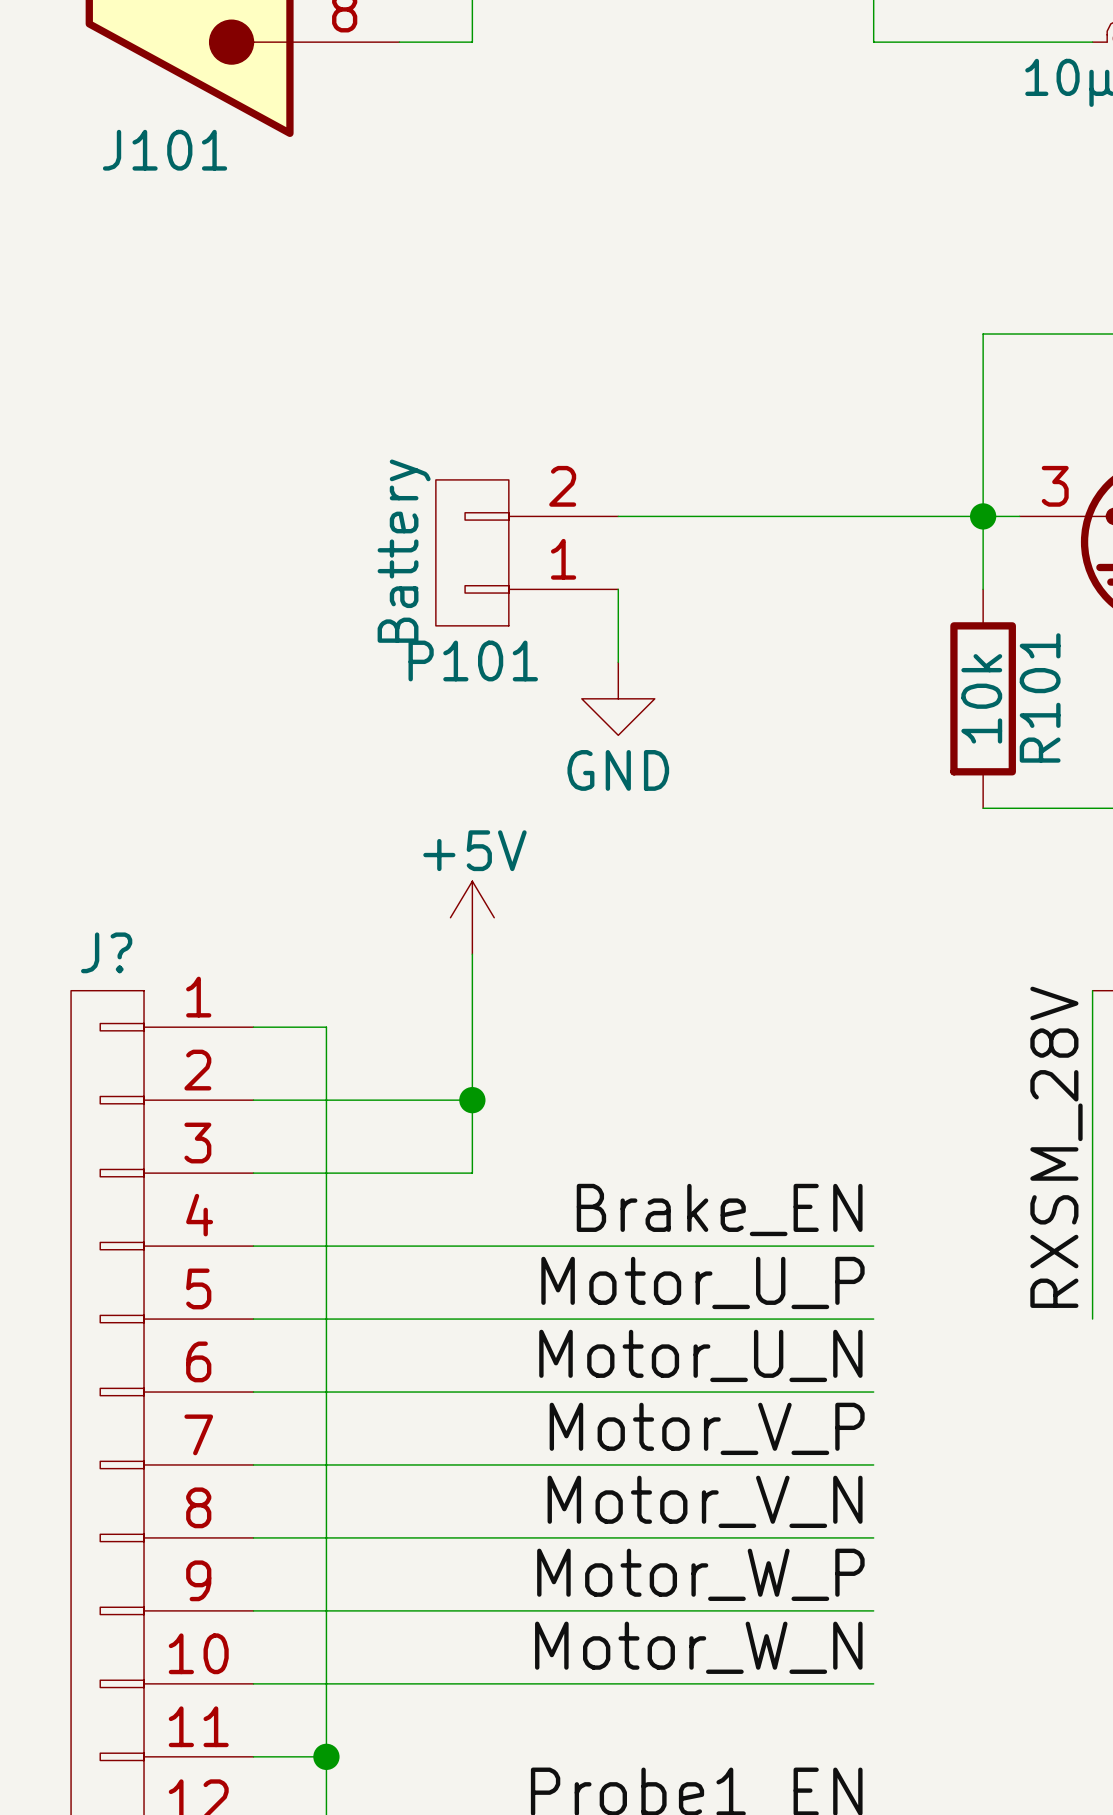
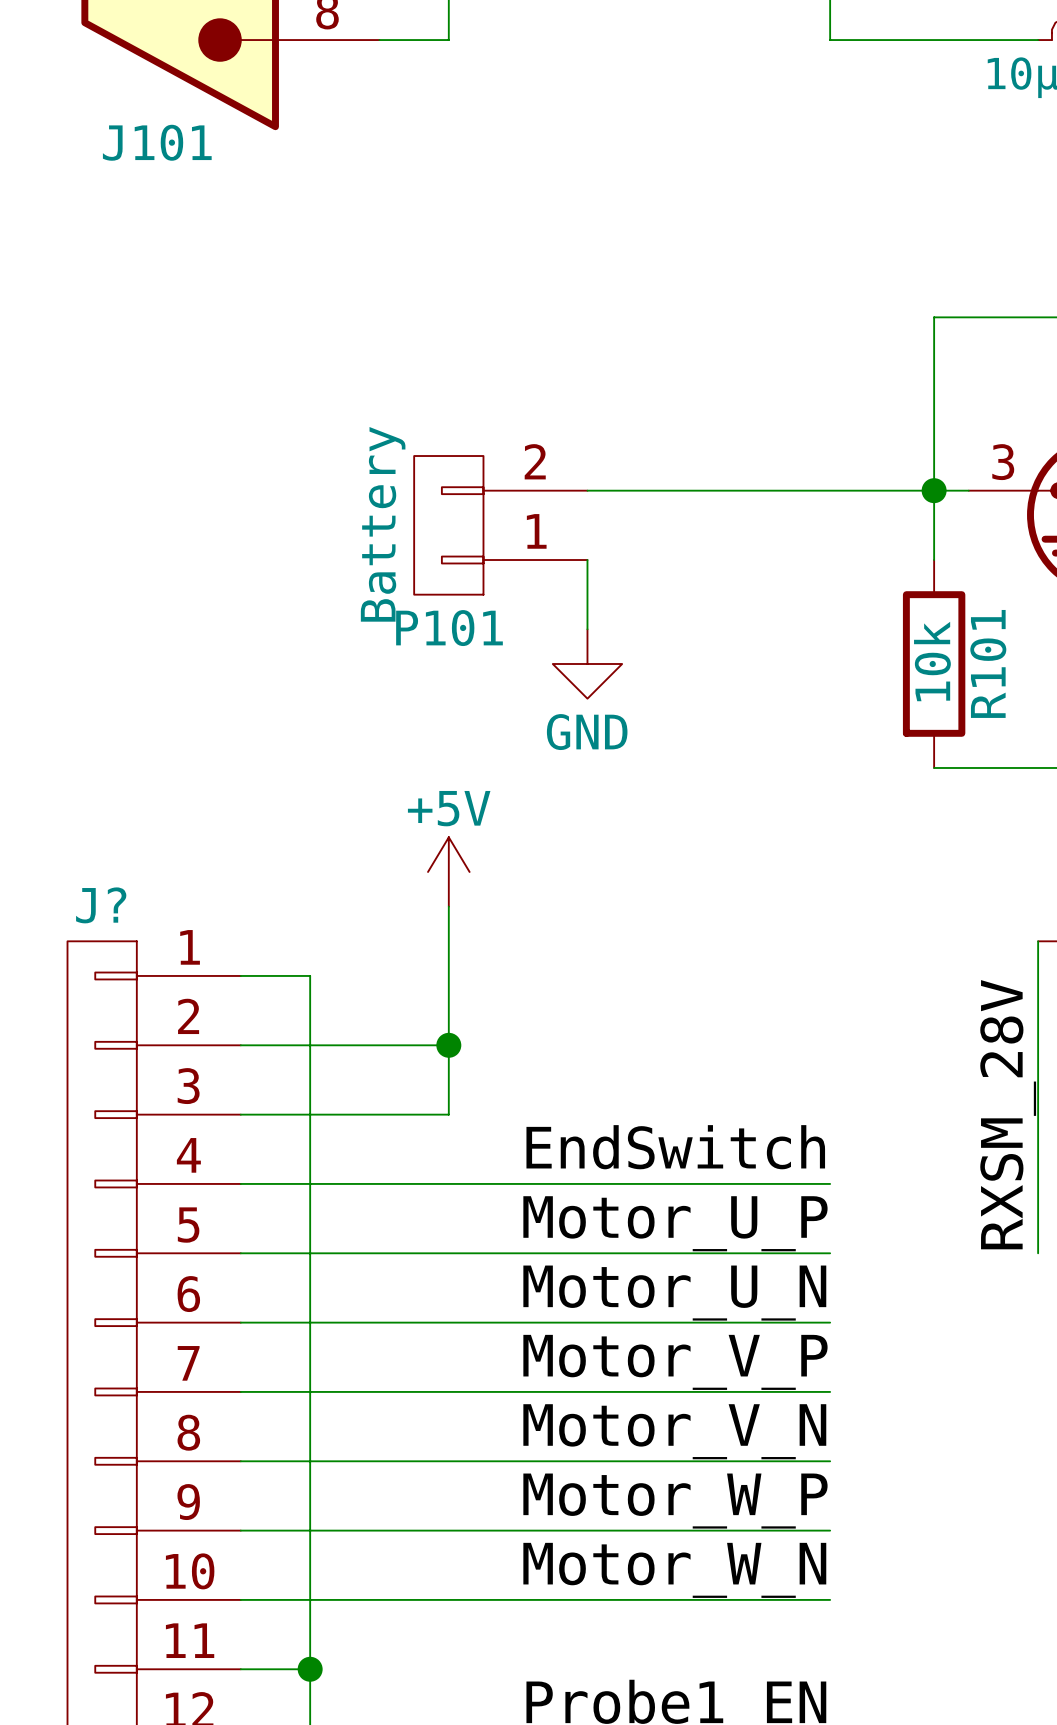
label: Brake_EN (719, 1209) -> EndSwitch (675, 1147)

